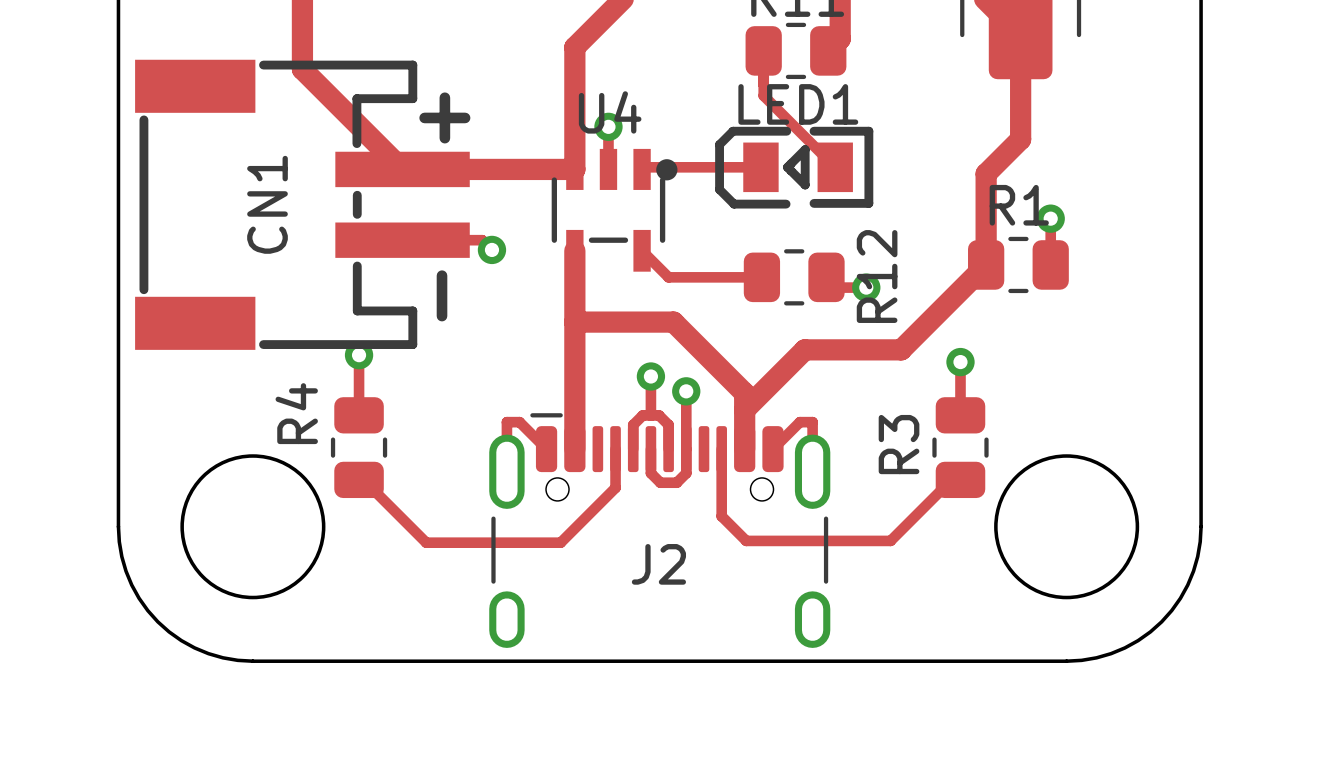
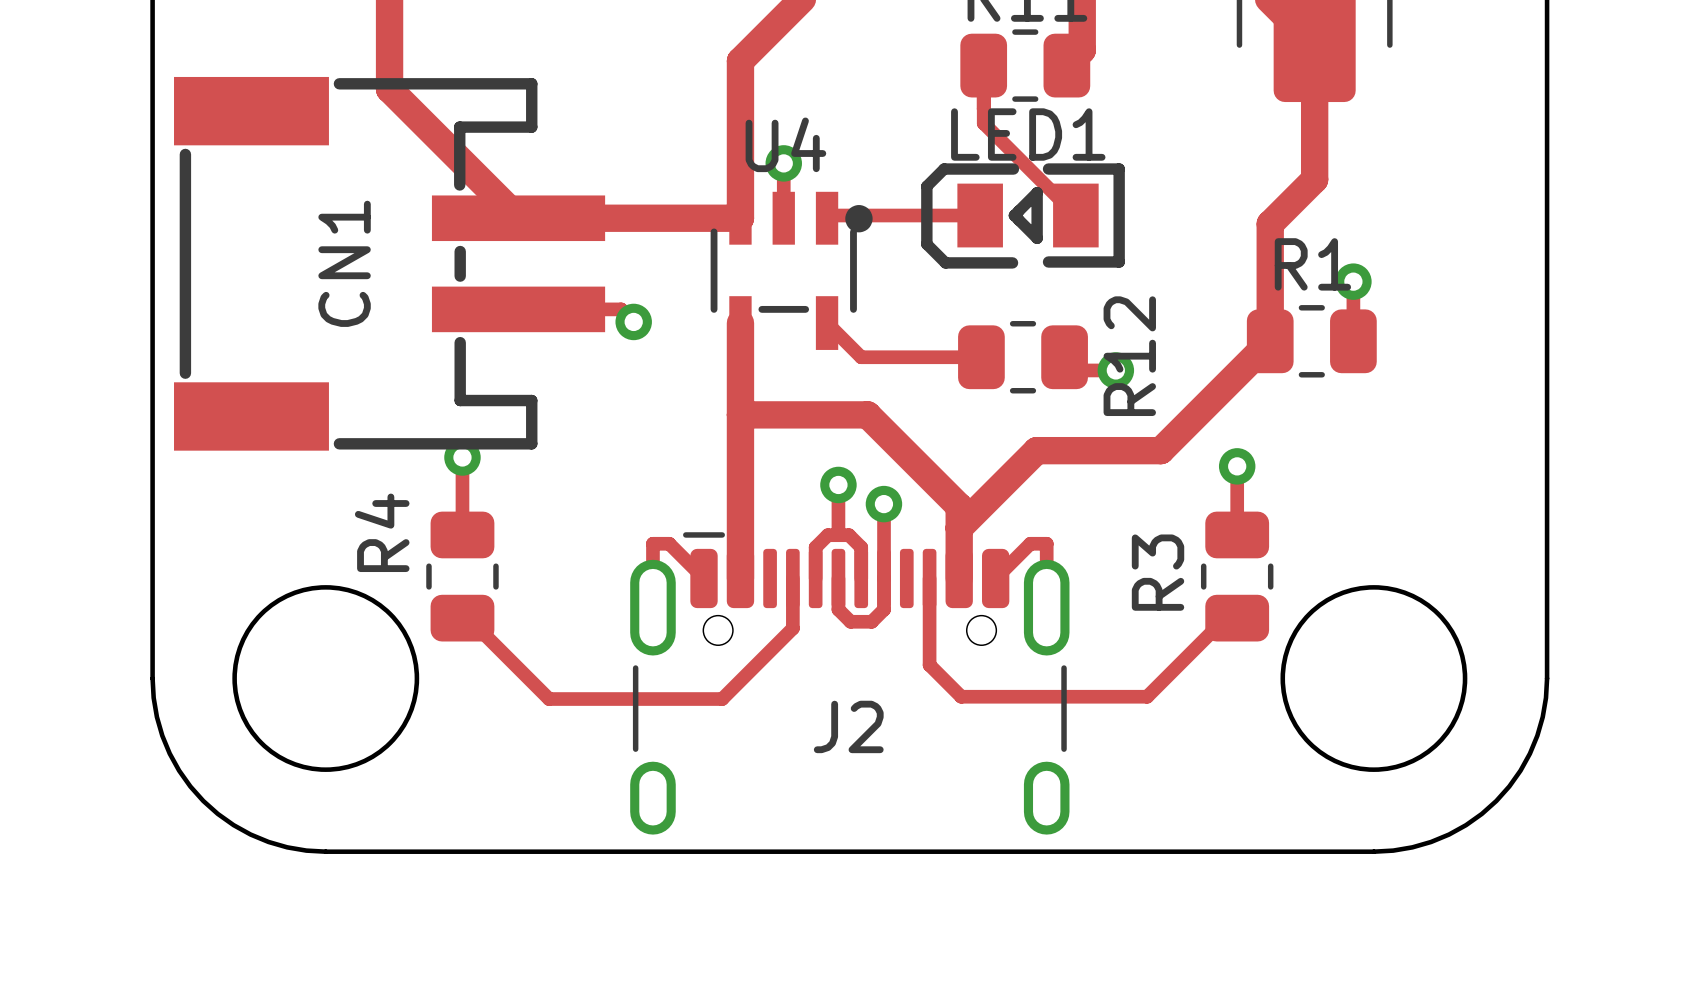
text: + (444, 117) -> none
text: - (442, 295) -> none

